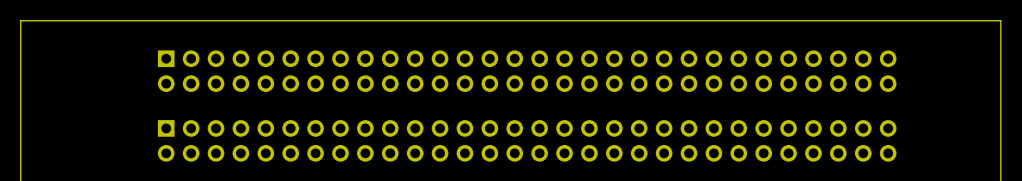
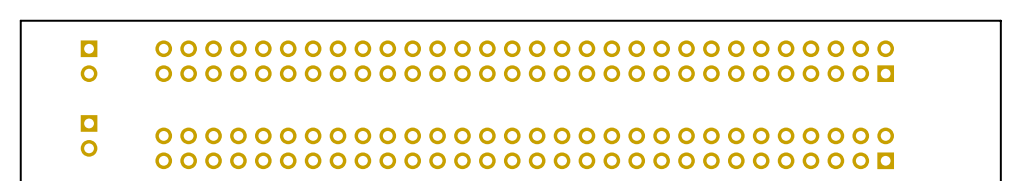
part: none -> (89, 61)
part rotation: 0° (527, 71) -> 180° (524, 61)
part: none -> (89, 135)
part rotation: 0° (527, 140) -> 180° (524, 148)

